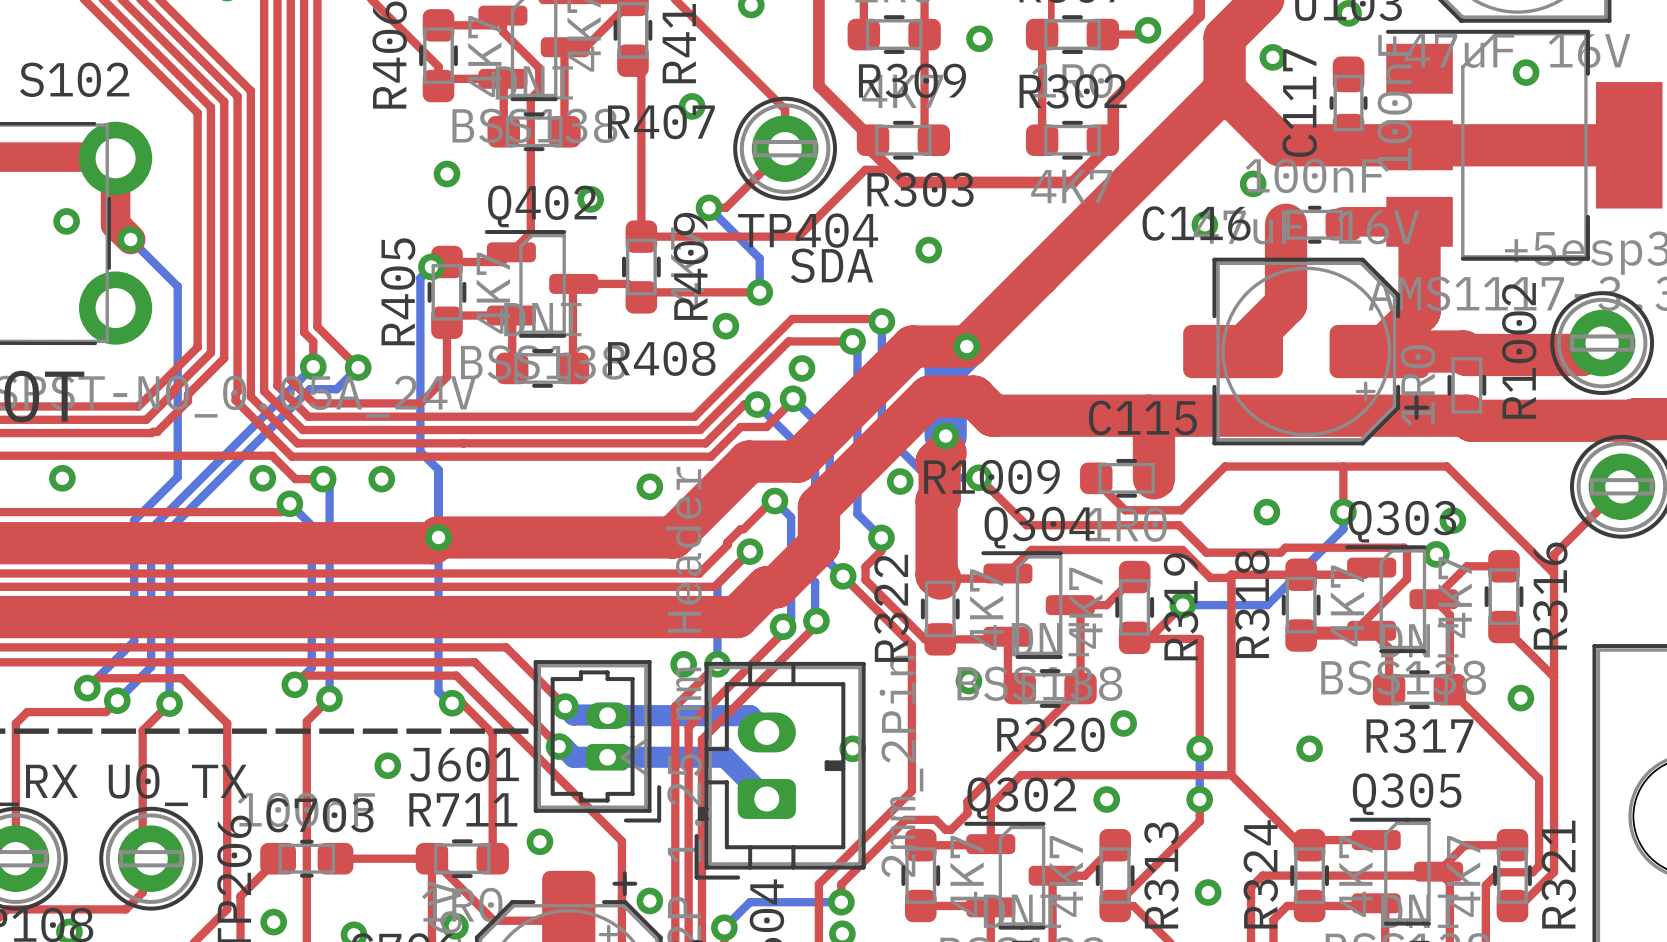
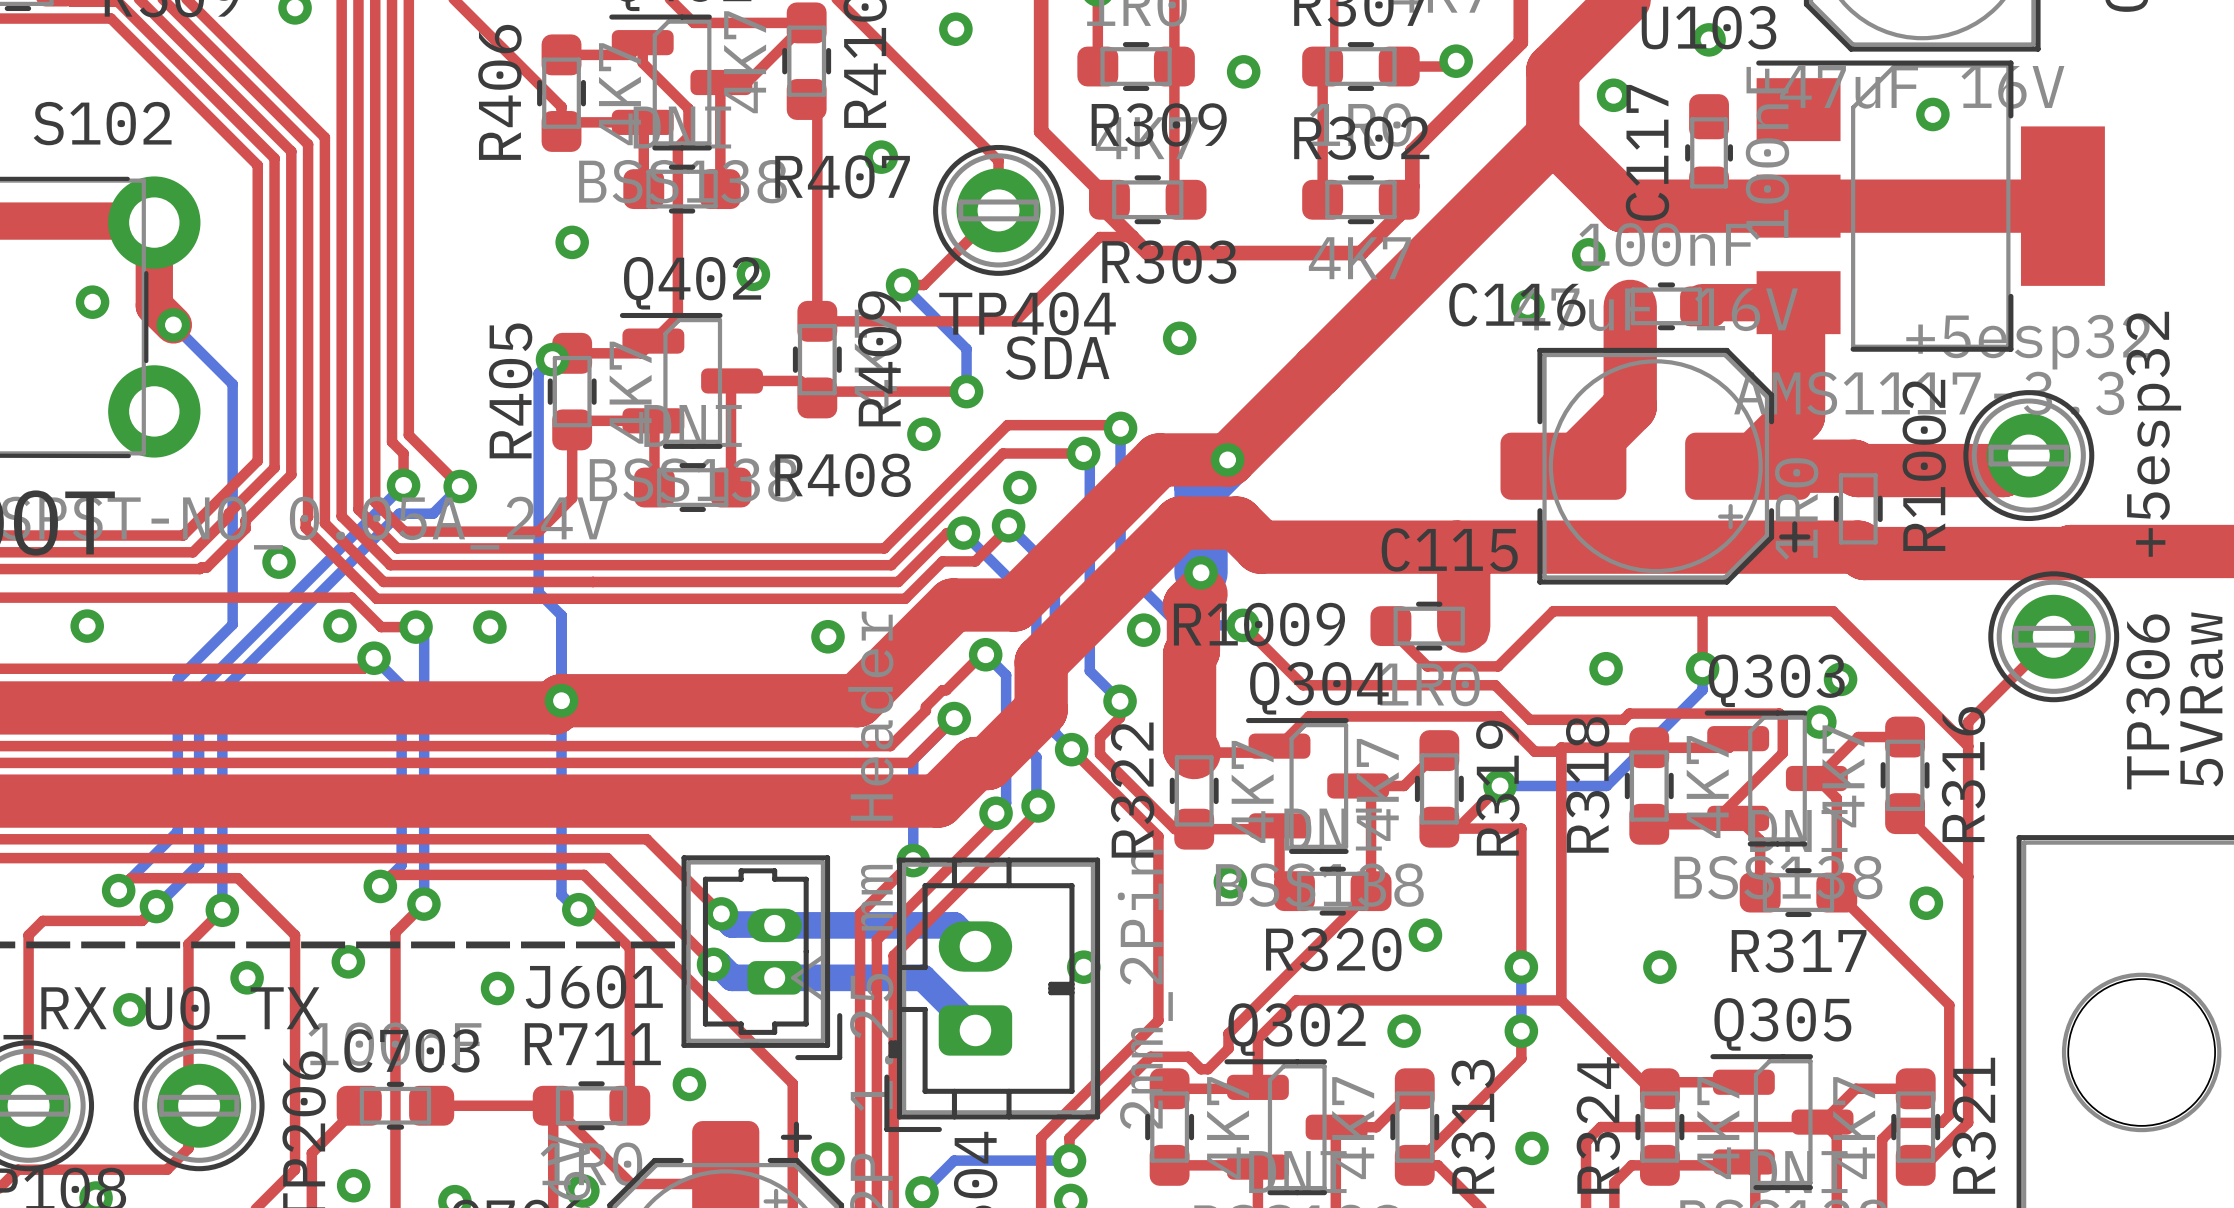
via: none -> (279, 562)
via: (683, 664) -> none
via: none -> (348, 961)
via: none -> (247, 977)
via: none -> (129, 1009)

